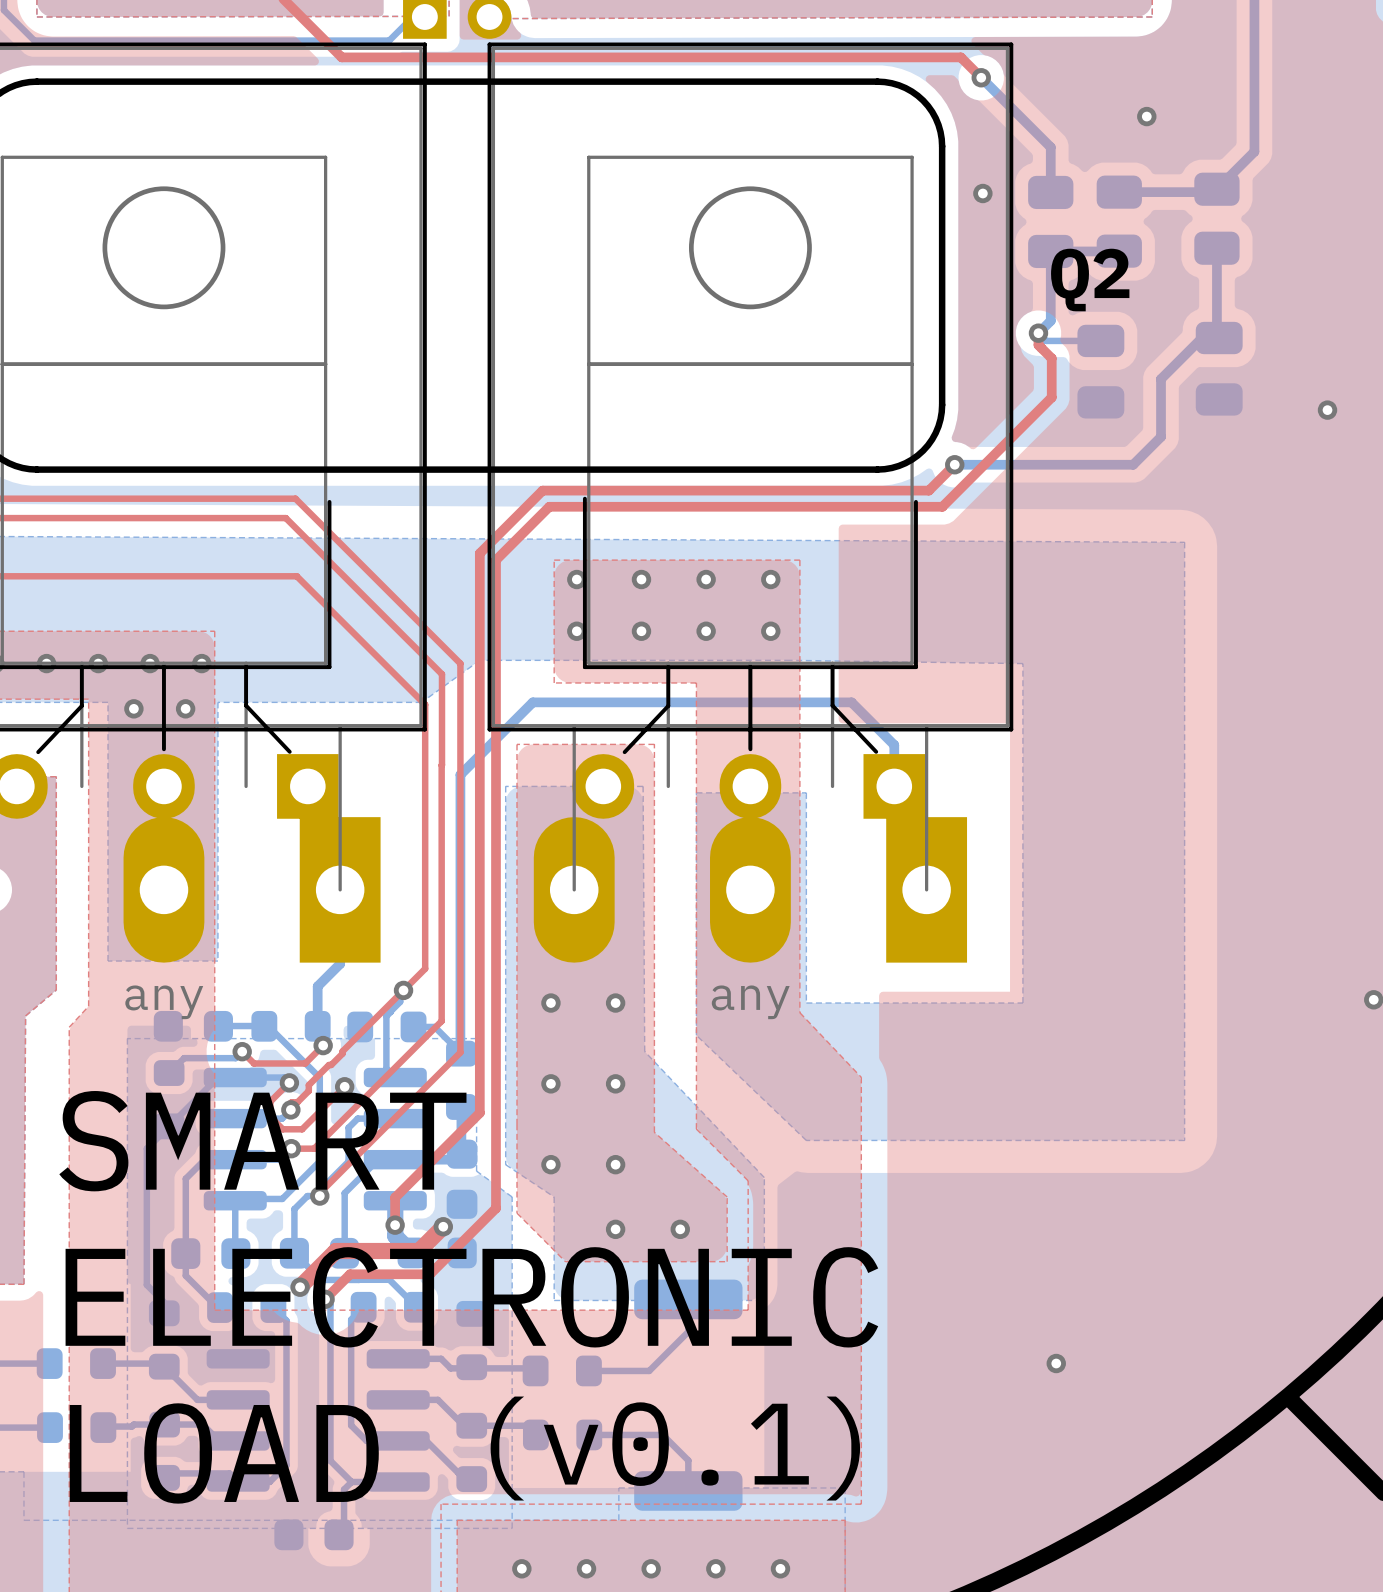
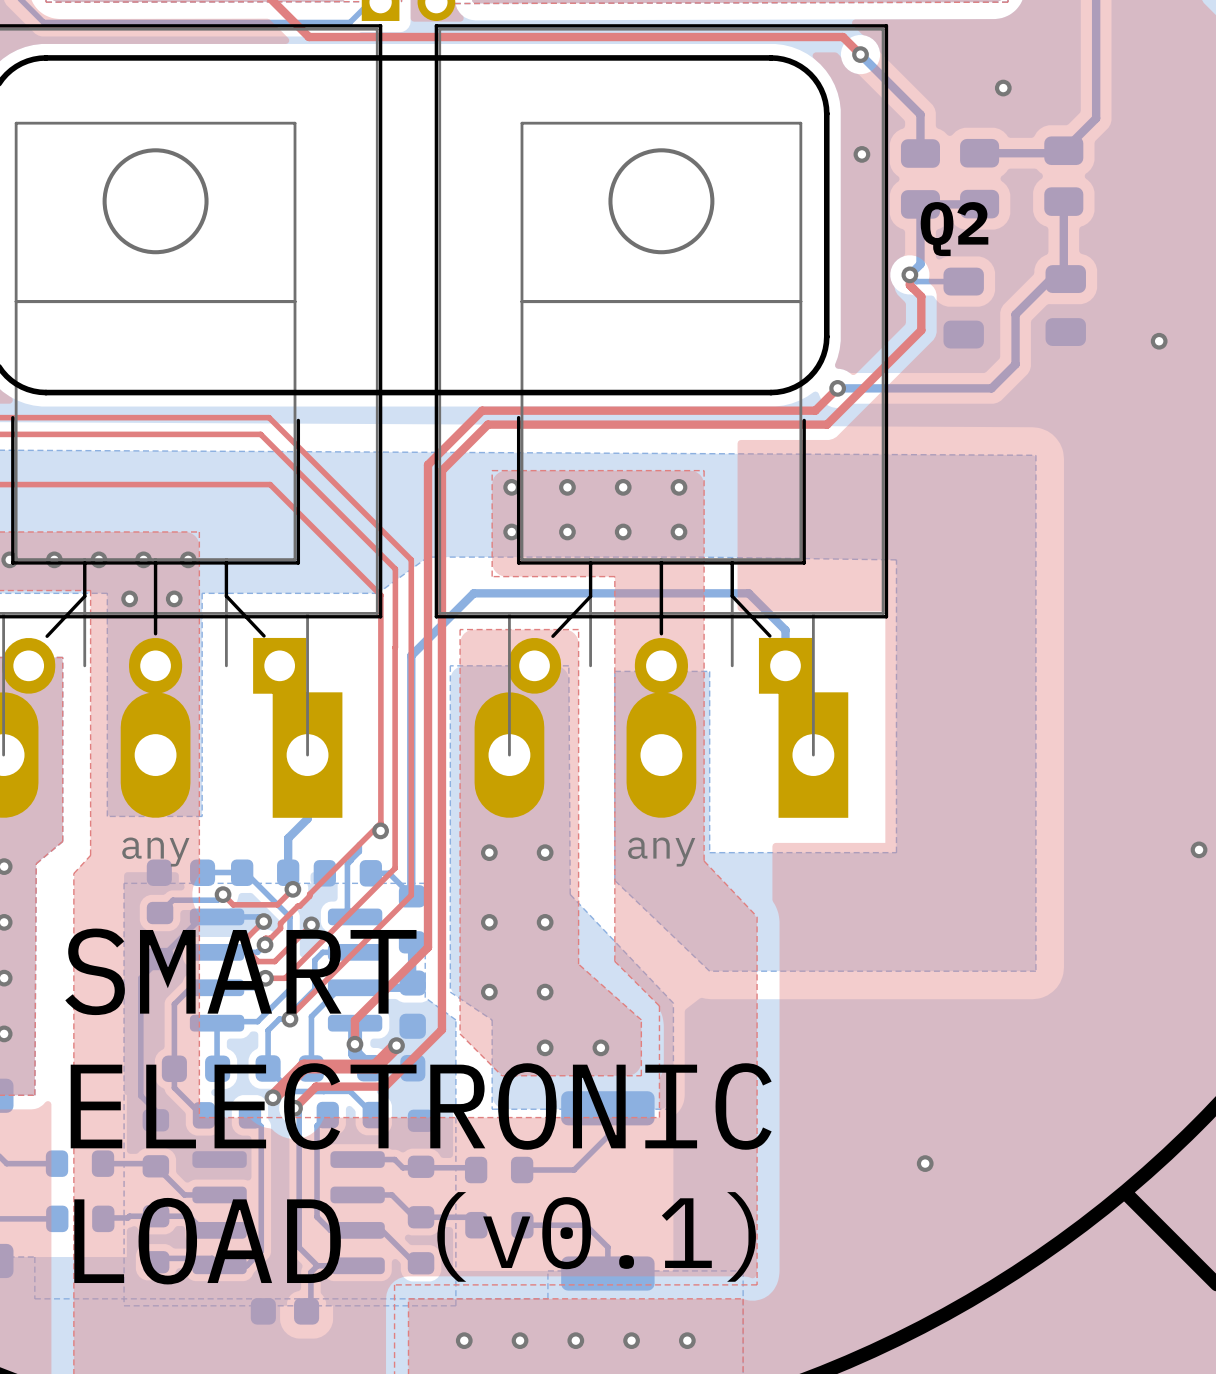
via position: (403, 990) -> (380, 830)

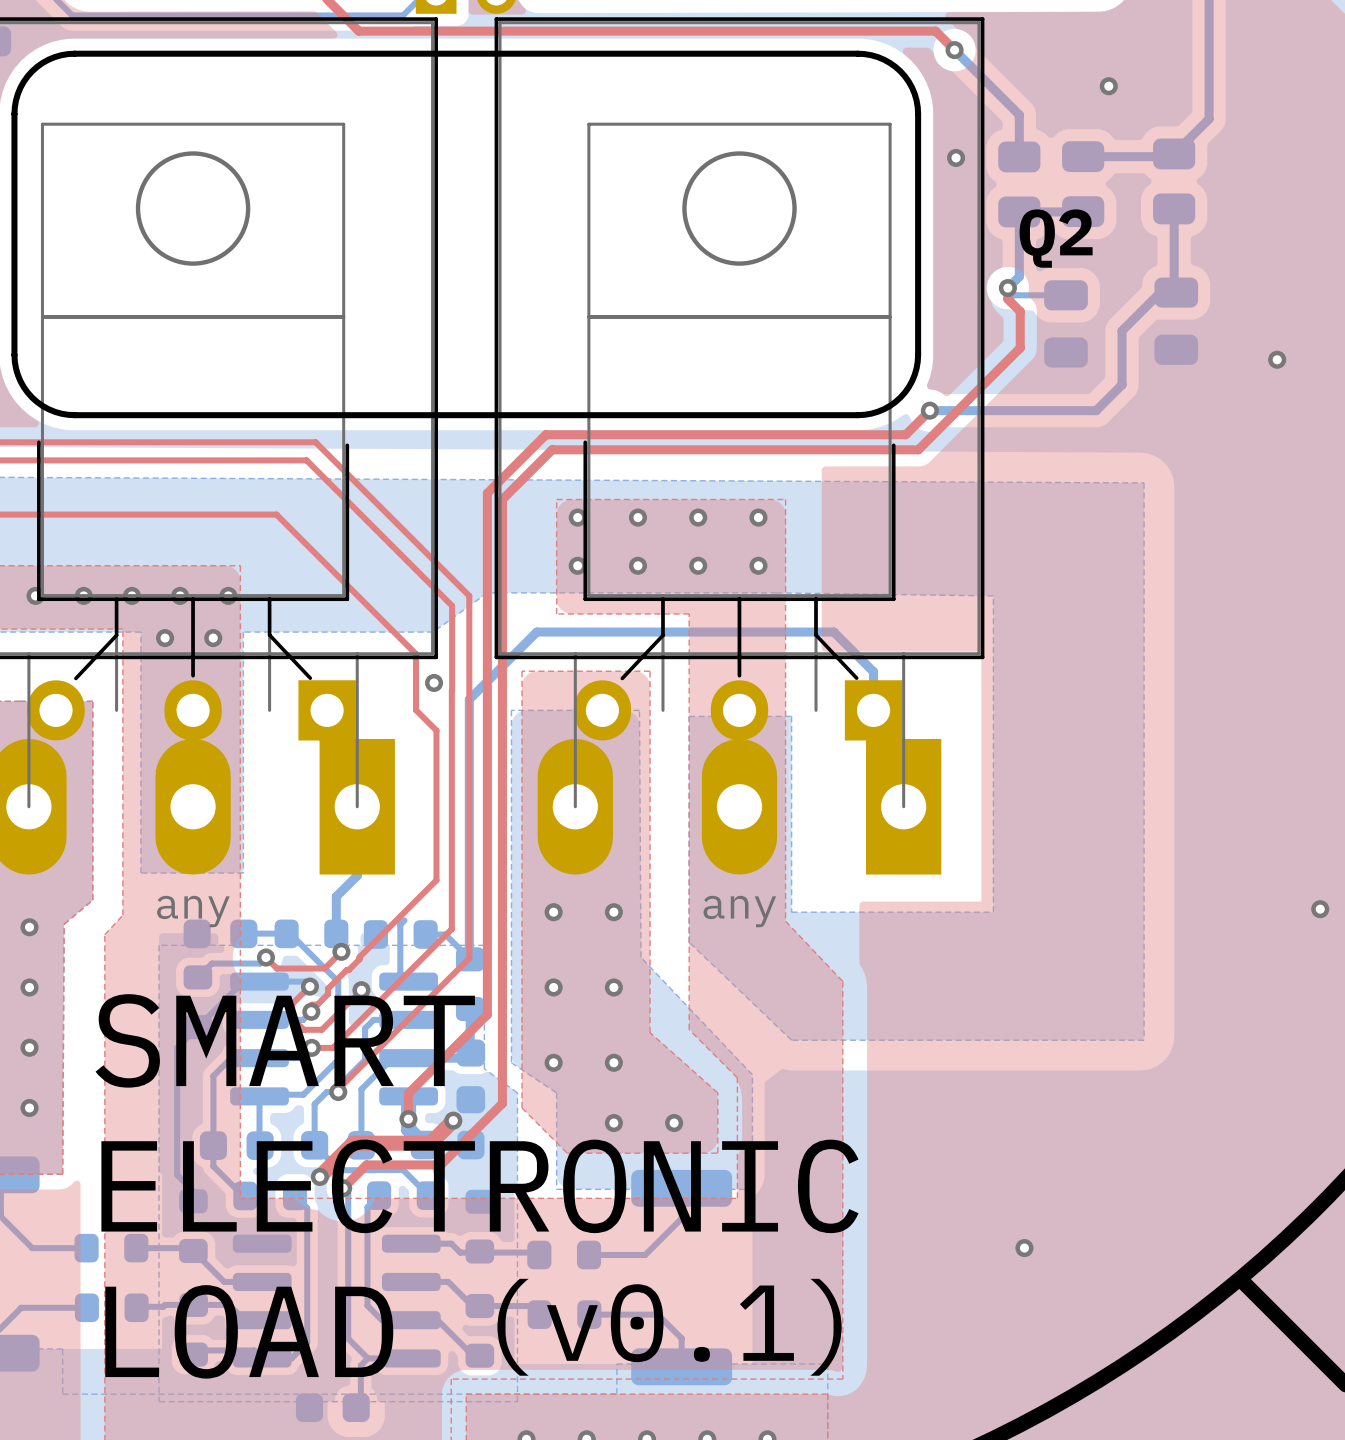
top track: (232, 484) (270, 484) (380, 595) (380, 684) -> (276, 514) (415, 654) (415, 710) (436, 730)
via: none -> (434, 682)
via: (380, 830) -> none
bottom track: (359, 844) (359, 851) (351, 859) -> none

